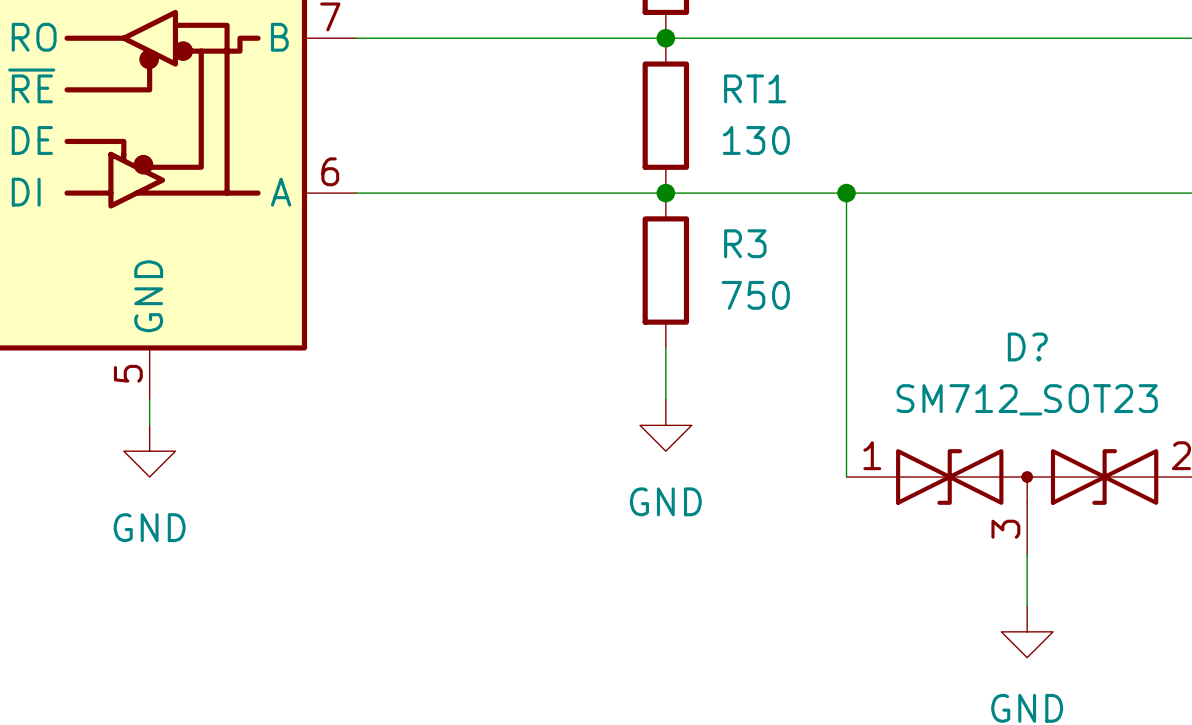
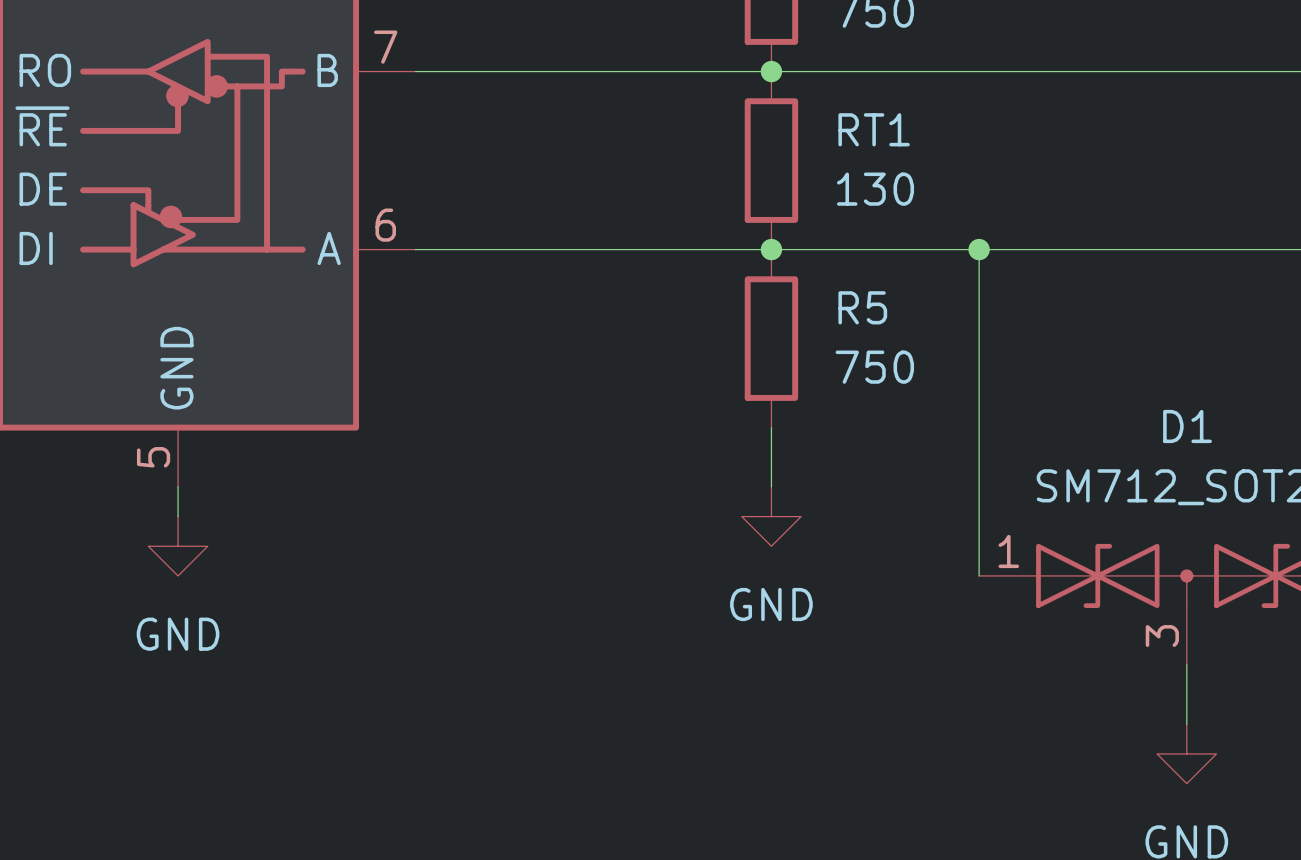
R3 name: R3 (745, 243) -> R5 (862, 307)
D? name: D? (1027, 346) -> D1 (1187, 426)

